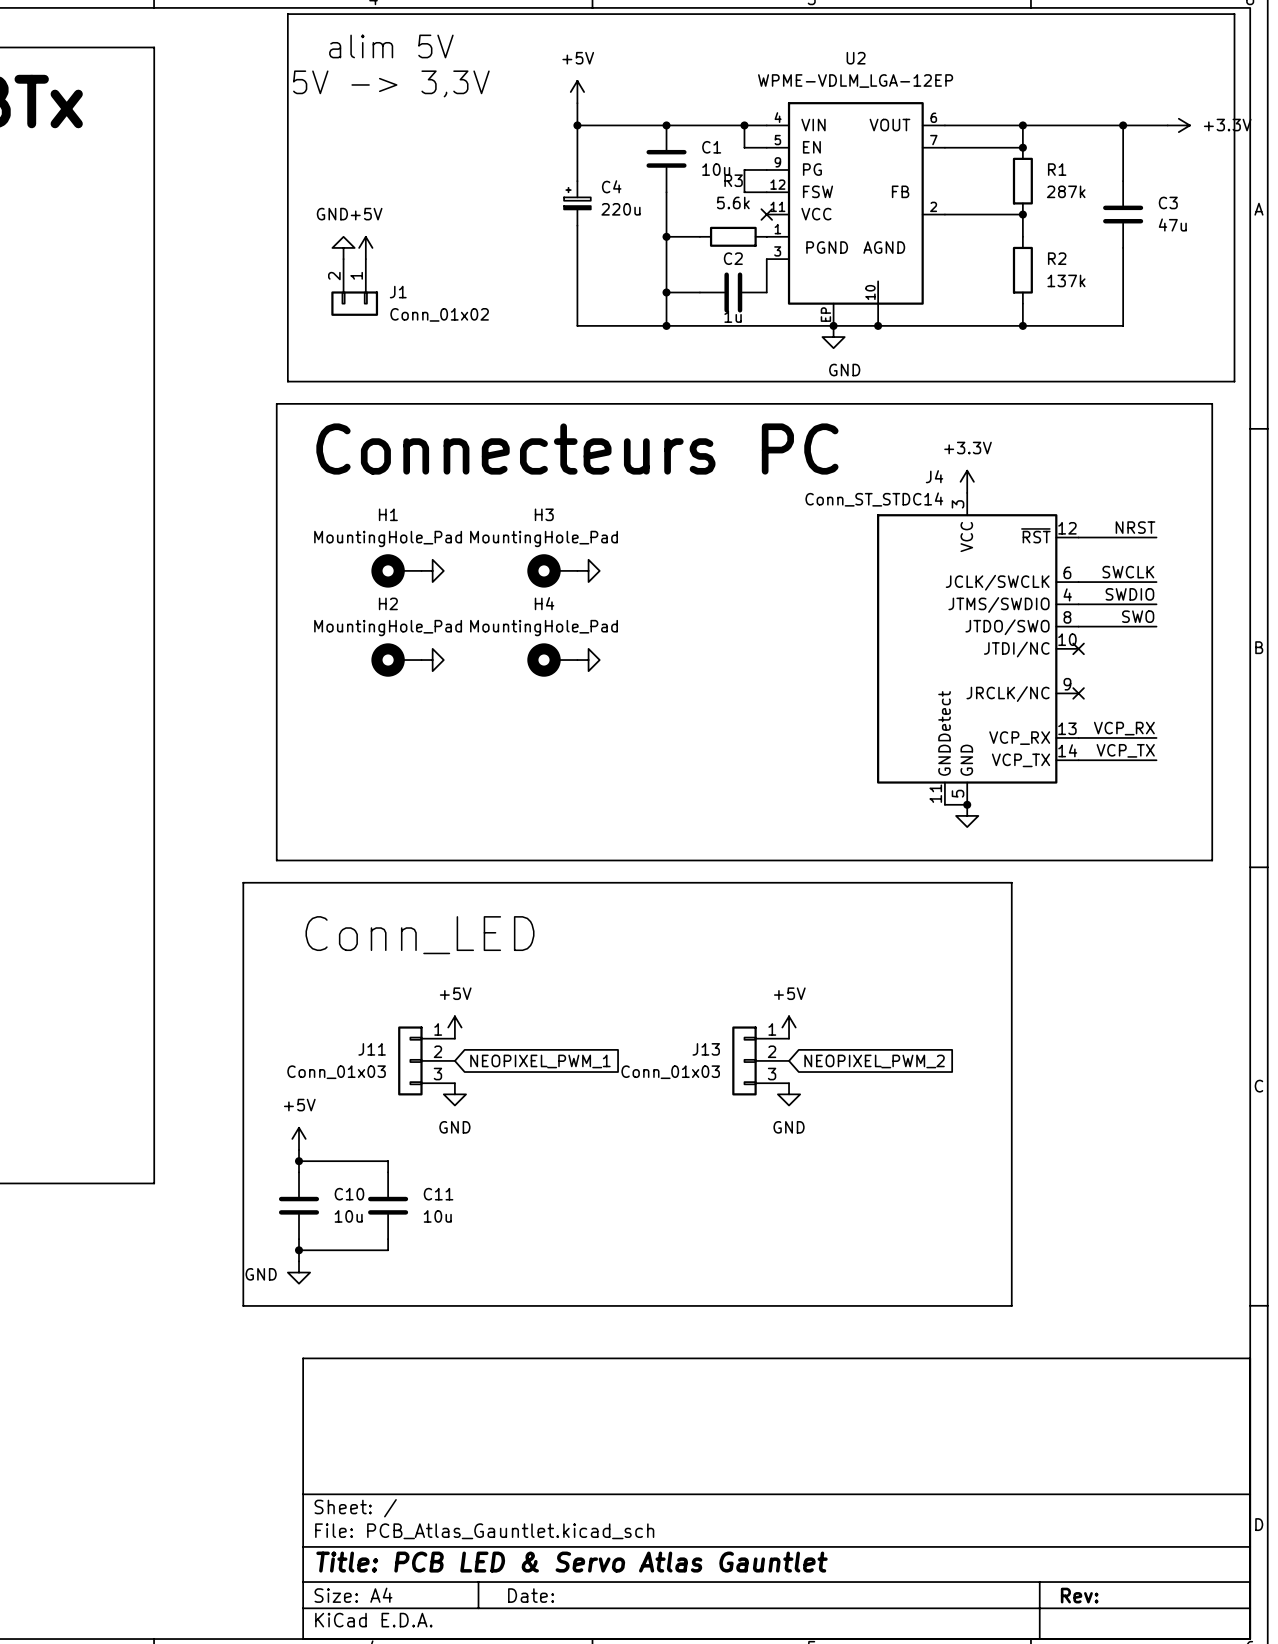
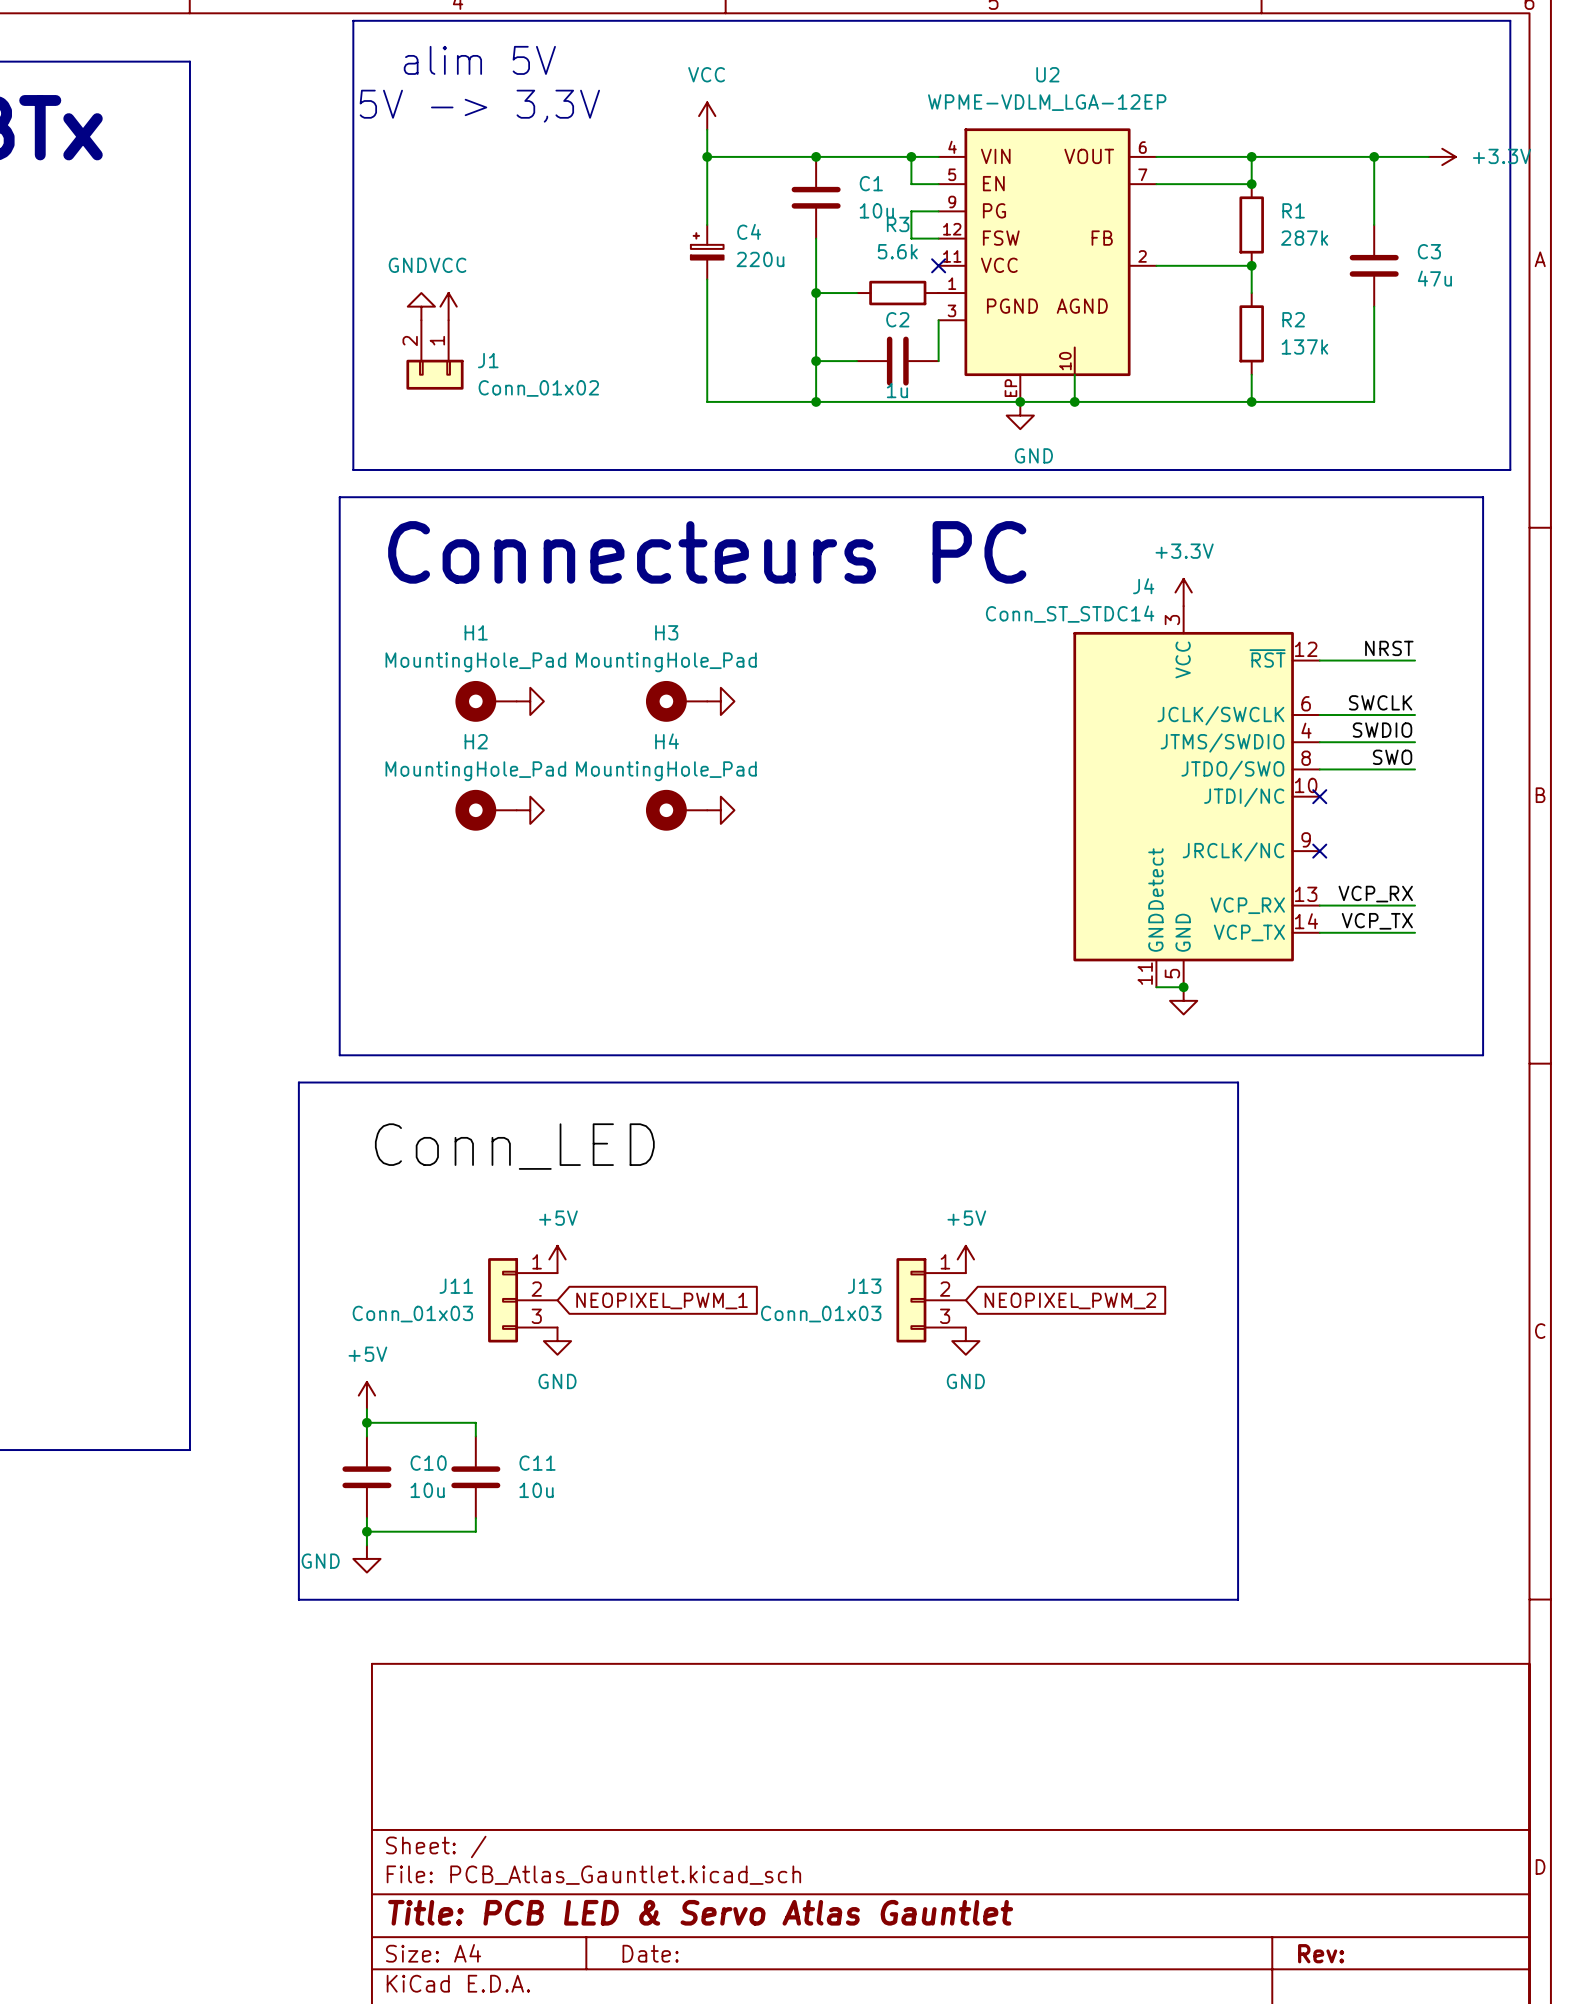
power symbol: +5V (577, 92) -> VCC (707, 116)
power symbol: +5V (365, 247) -> VCC (448, 306)

